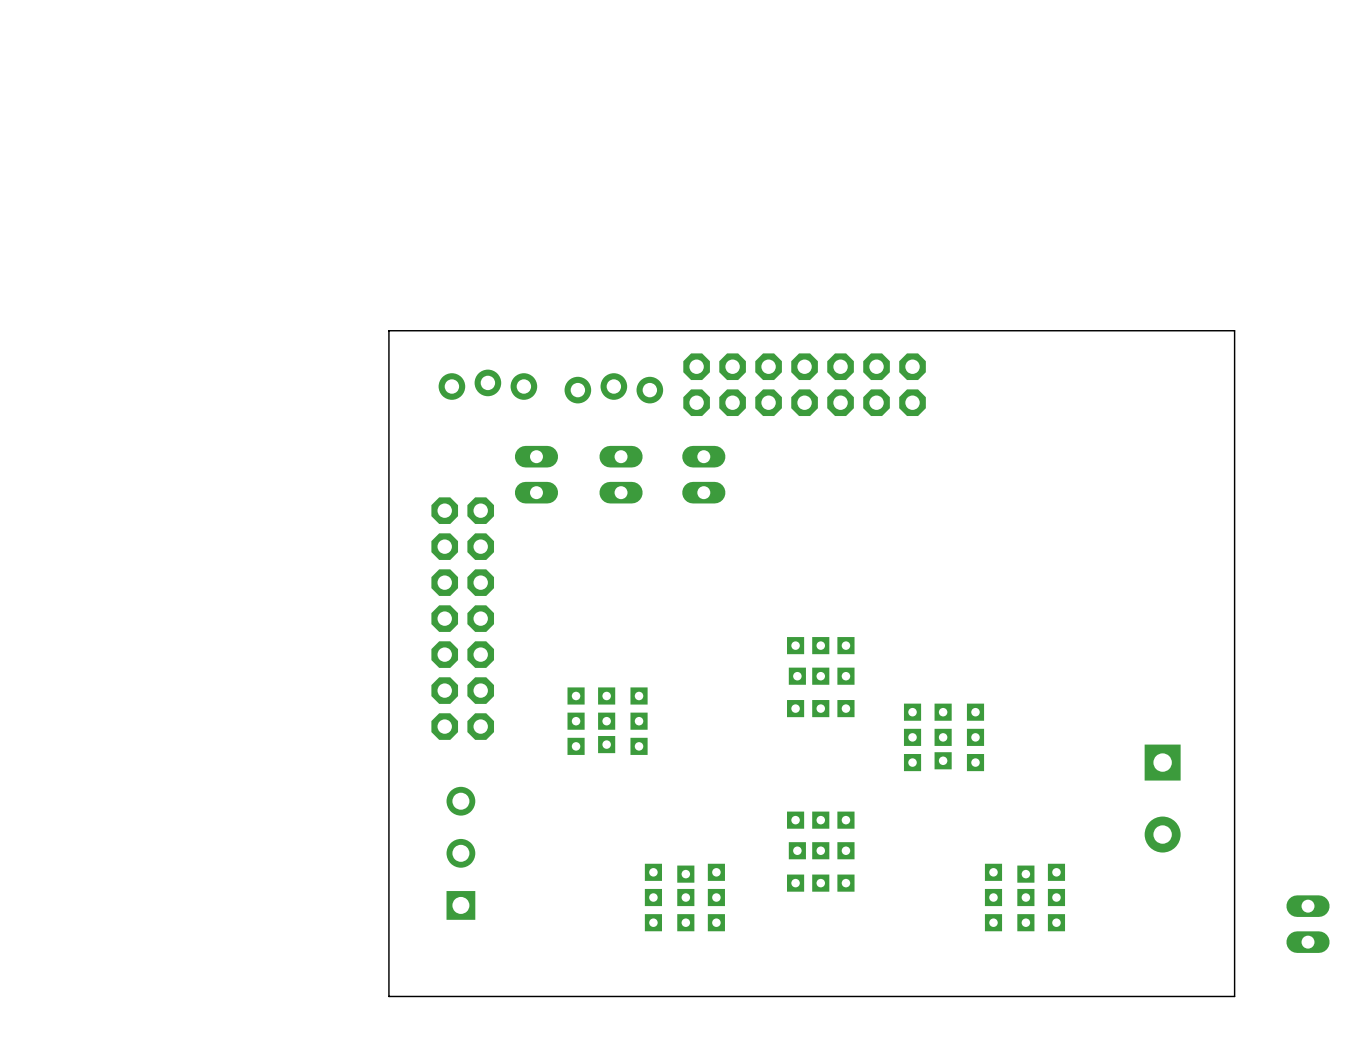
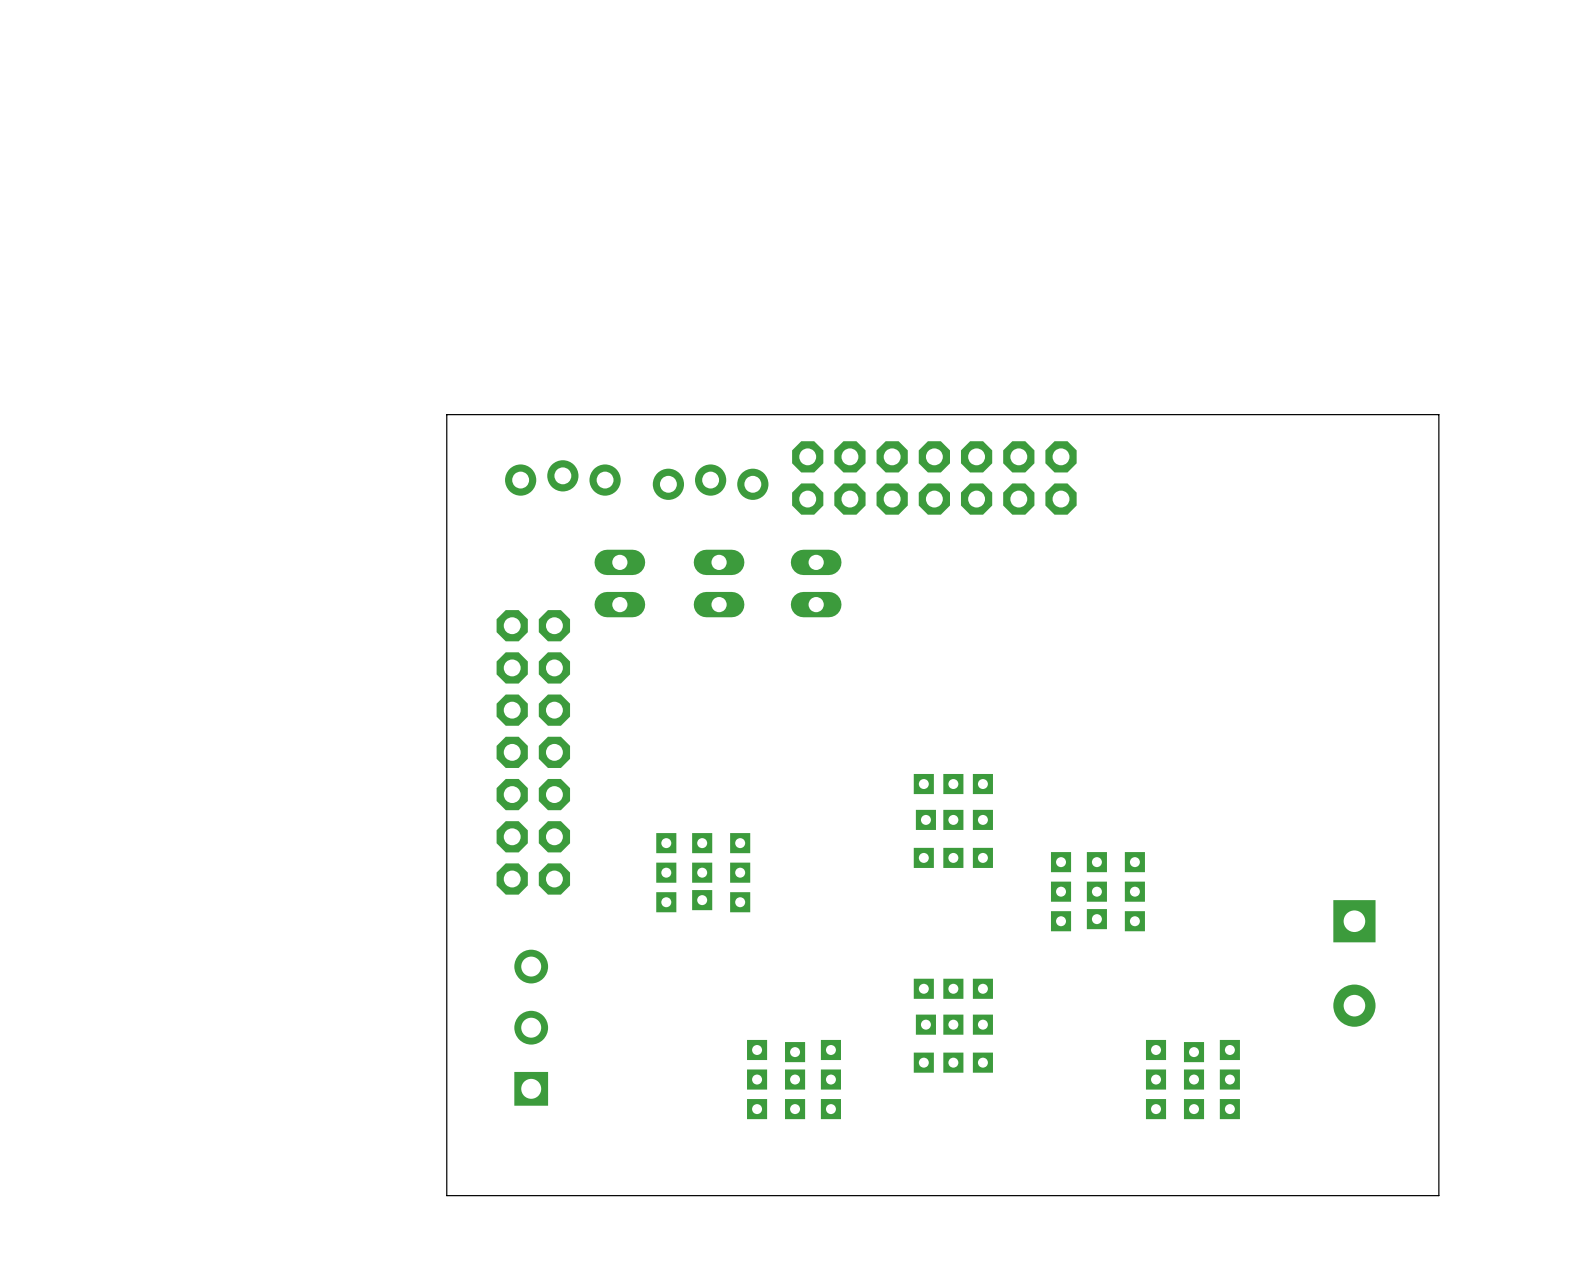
part: (1308, 924) -> none

